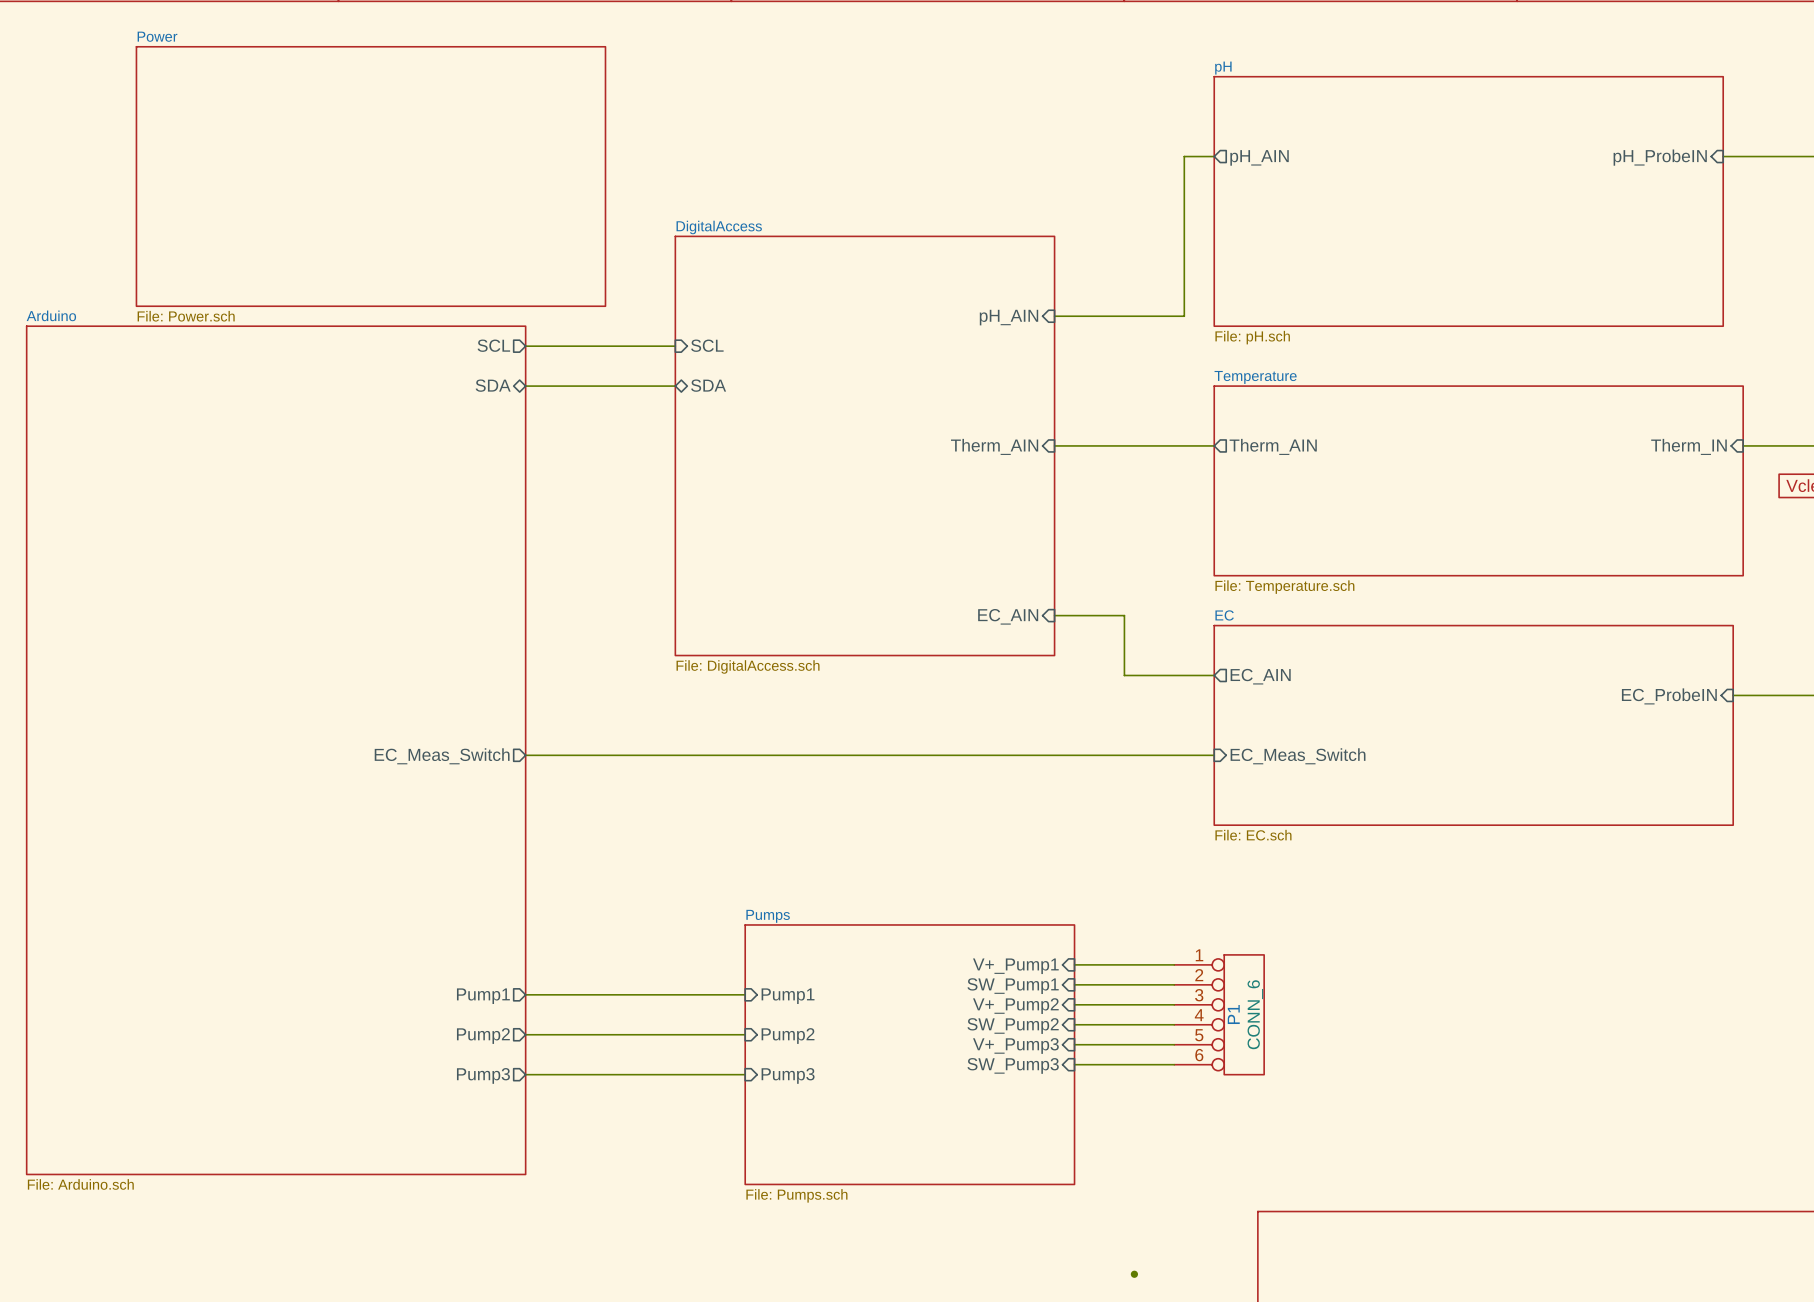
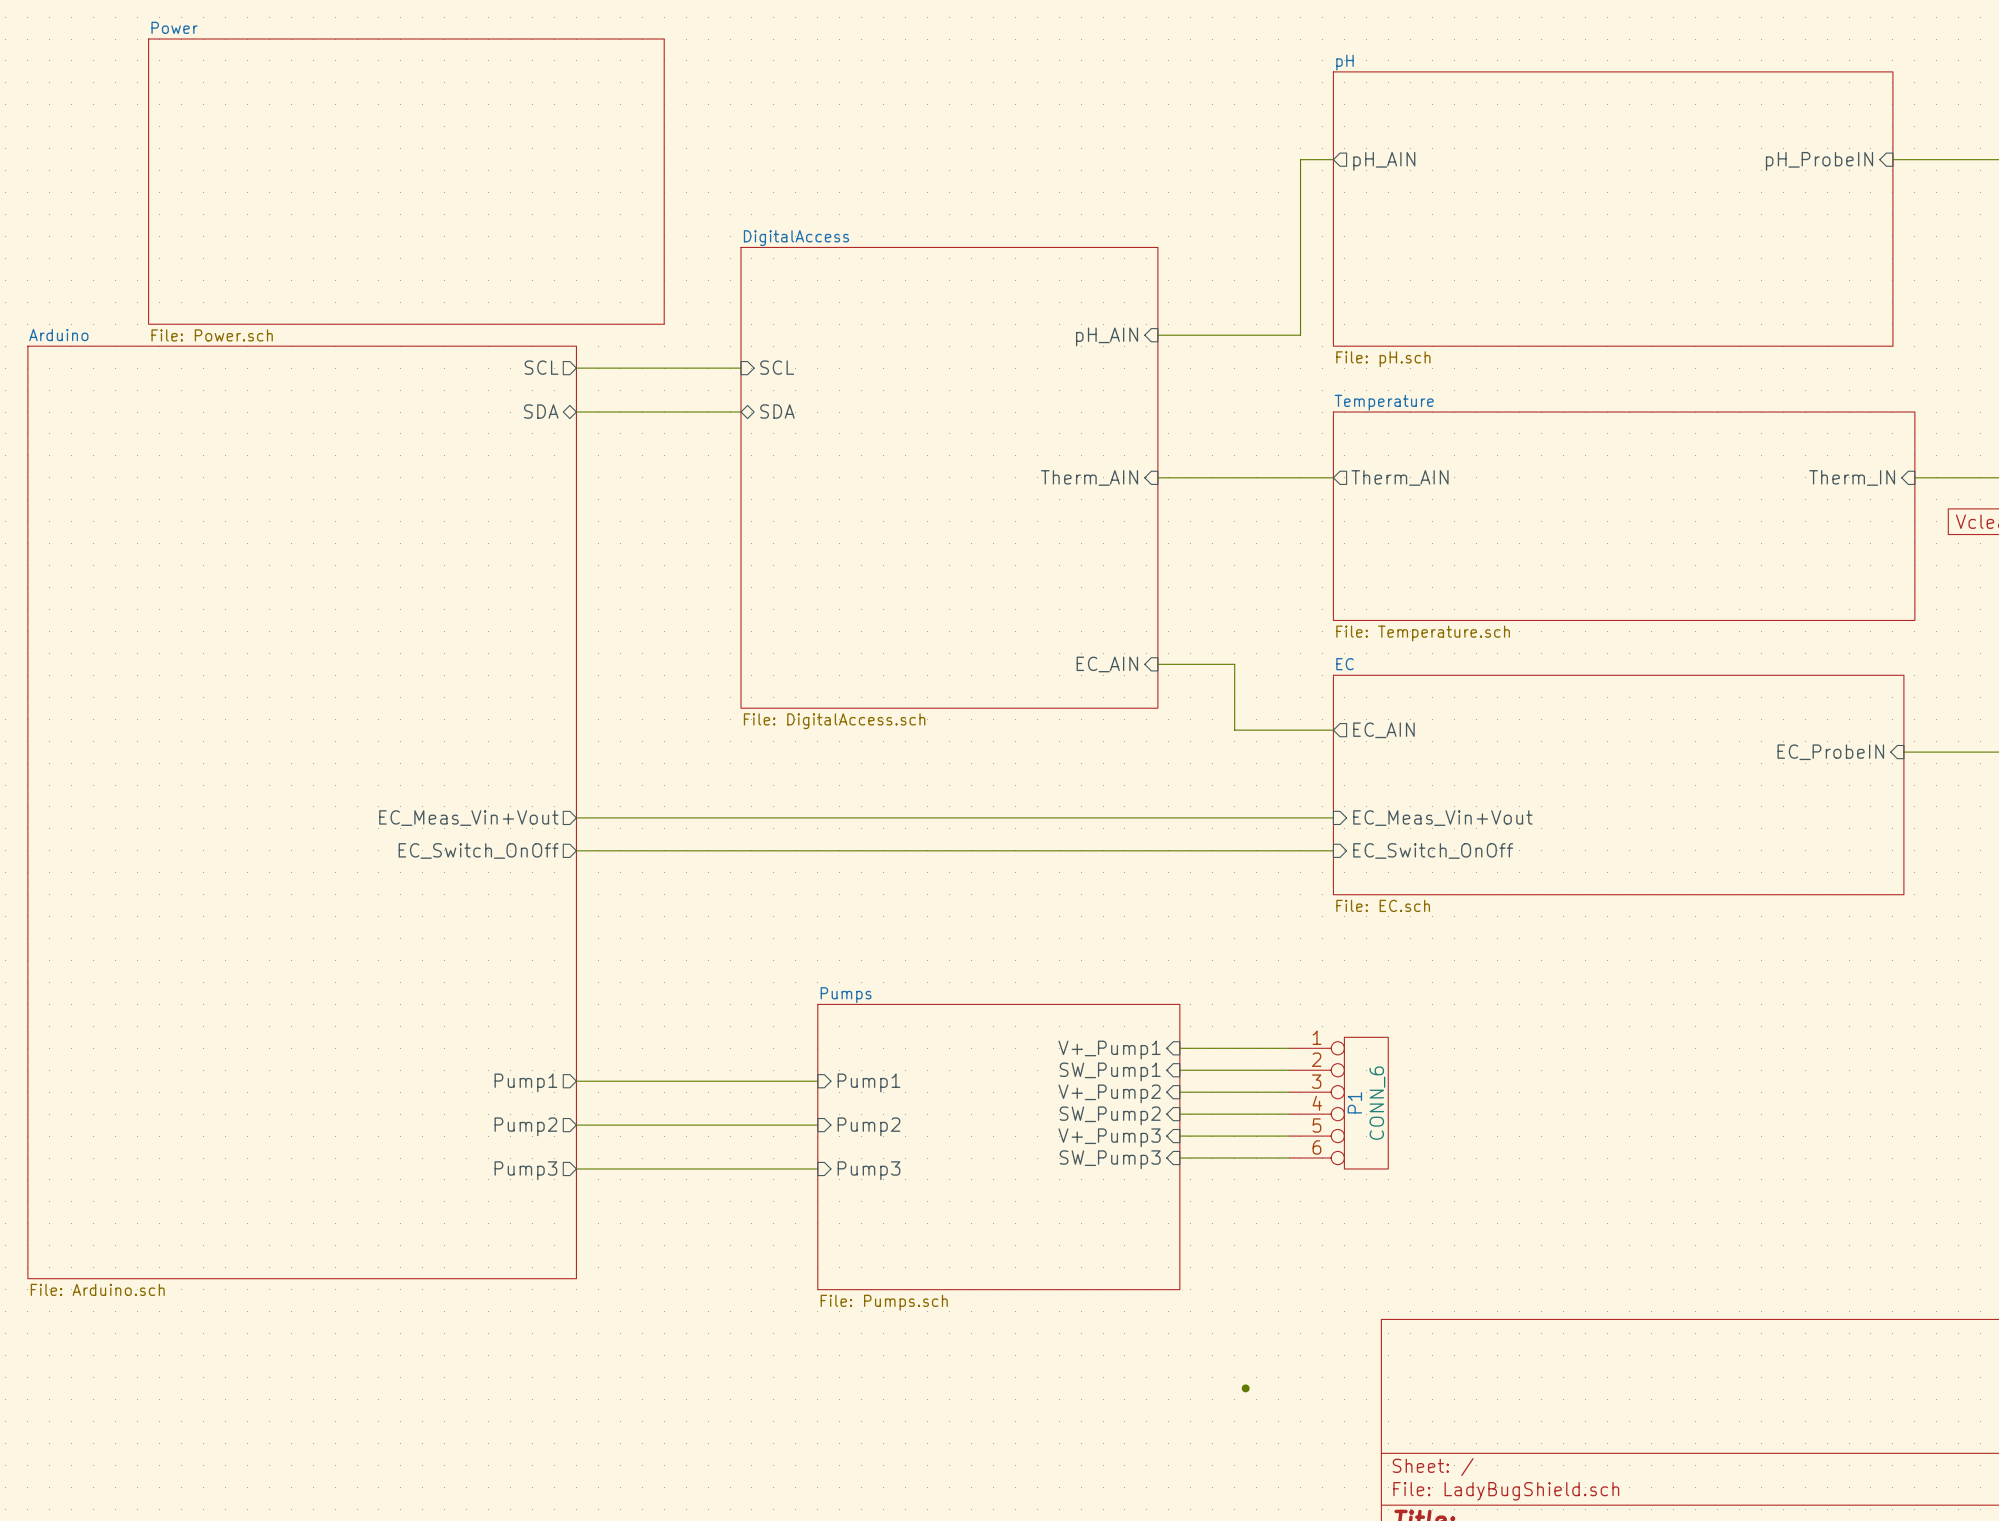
sheet pin: EC_Meas_Switch (442, 756) -> EC_Meas_Vin+Vout (468, 818)
sheet pin: EC_Meas_Switch (1298, 756) -> EC_Meas_Vin+Vout (1442, 818)
wire: none -> (576, 850) (1333, 850)
sheet pin: none -> EC_Switch_OnOff (478, 850)
sheet pin: none -> EC_Switch_OnOff (1433, 850)

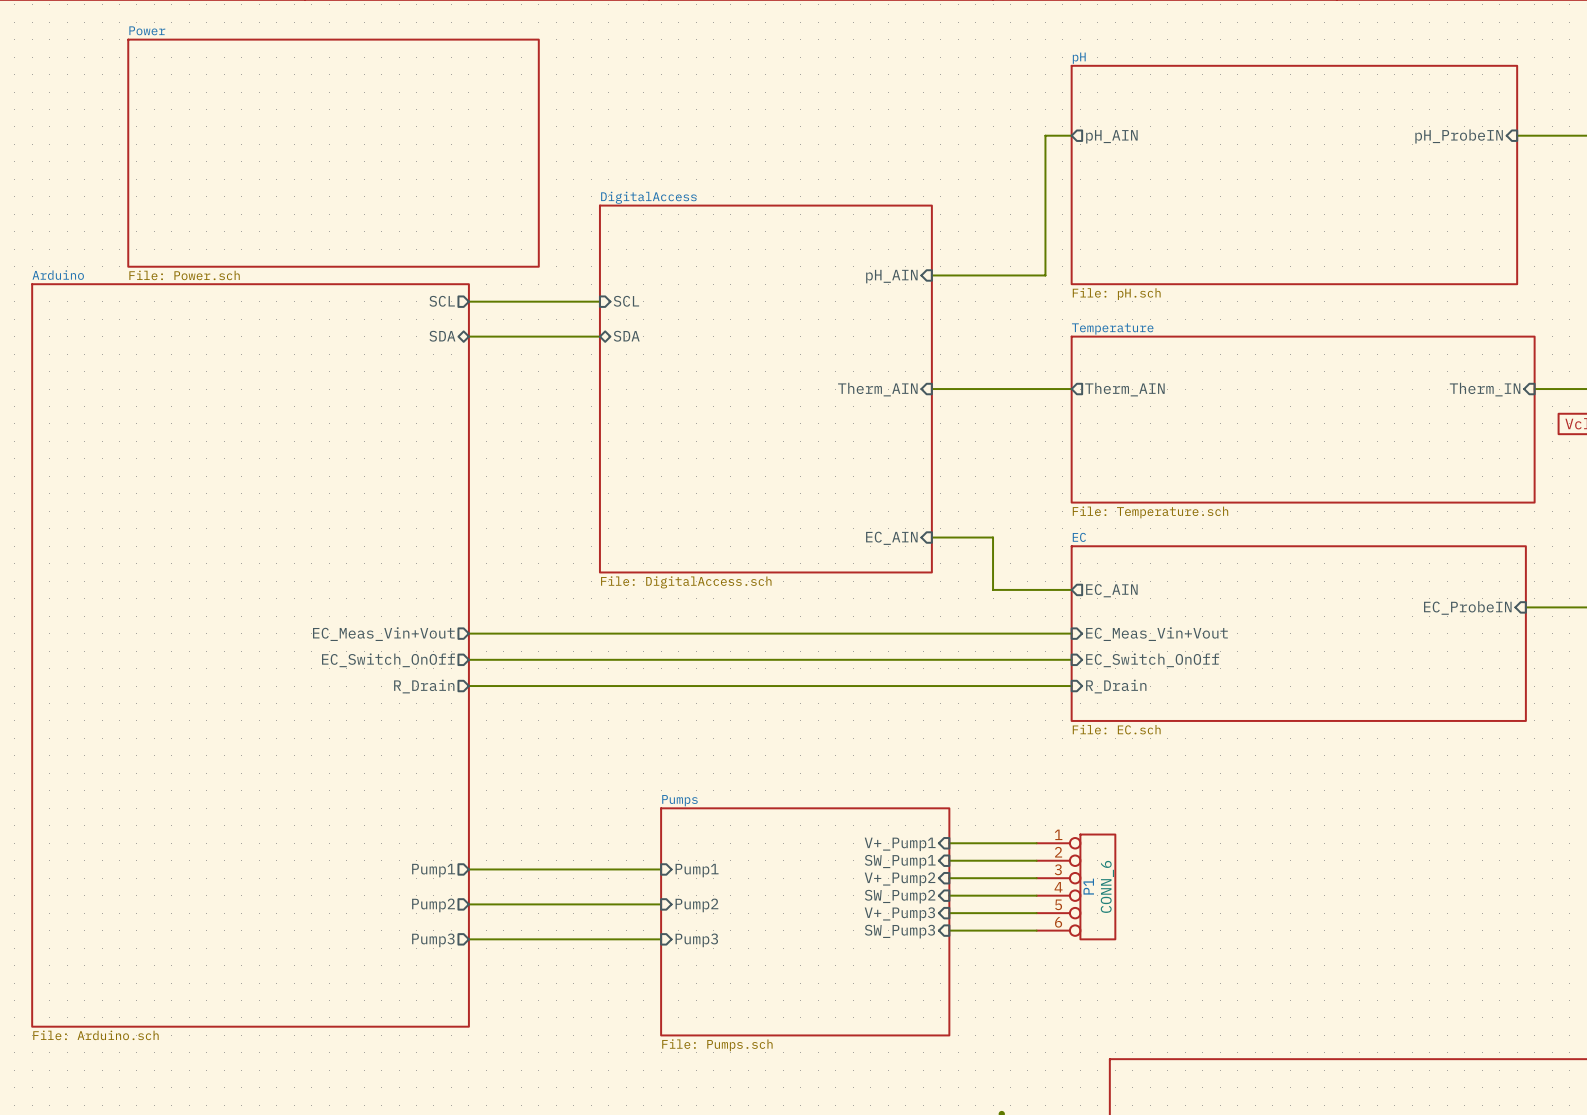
sheet pin: none -> EC_Meas_Vin+Vout (383, 634)
wire: none -> (468, 633) (1071, 633)
sheet pin: none -> EC_Meas_Vin+Vout (1156, 634)
sheet pin: EC_Meas_Vin+Vout (468, 818) -> EC_Switch_OnOff (388, 660)
sheet pin: EC_Meas_Vin+Vout (1442, 818) -> EC_Switch_OnOff (1152, 660)
sheet pin: EC_Switch_OnOff (478, 850) -> R_Drain (424, 686)
sheet pin: EC_Switch_OnOff (1433, 850) -> R_Drain (1116, 686)

